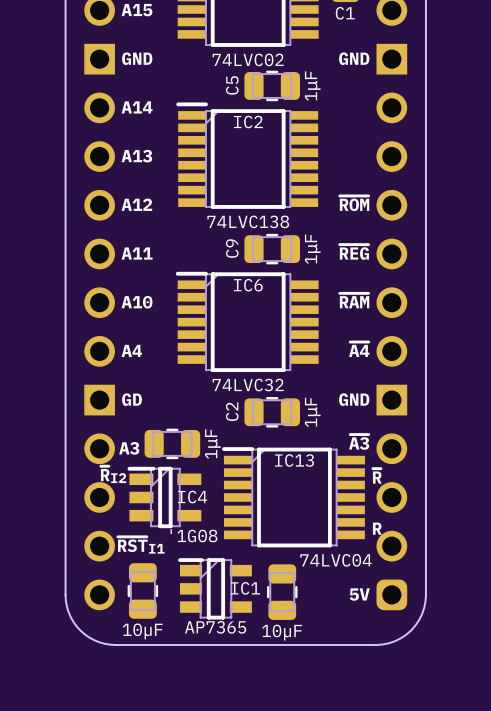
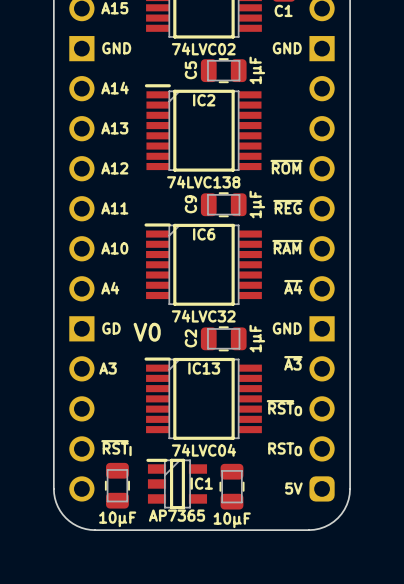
text: none -> V0 (147, 332)
part: 1μF (172, 443) -> none
text: ~{R}I2 (113, 474) -> none
text: ~{R} (377, 476) -> none
text: none -> ~{RST}O (284, 408)
IC4: (164, 497) -> none
IC13 position: (293, 497) -> (203, 398)
text: R (377, 528) -> none
text: ~{RST}I1 (141, 545) -> ~{RST}I (116, 448)
text: none -> RSTO (285, 449)
IC13 text position: 74LVC04 (336, 560) -> 74LVC04 (203, 450)

